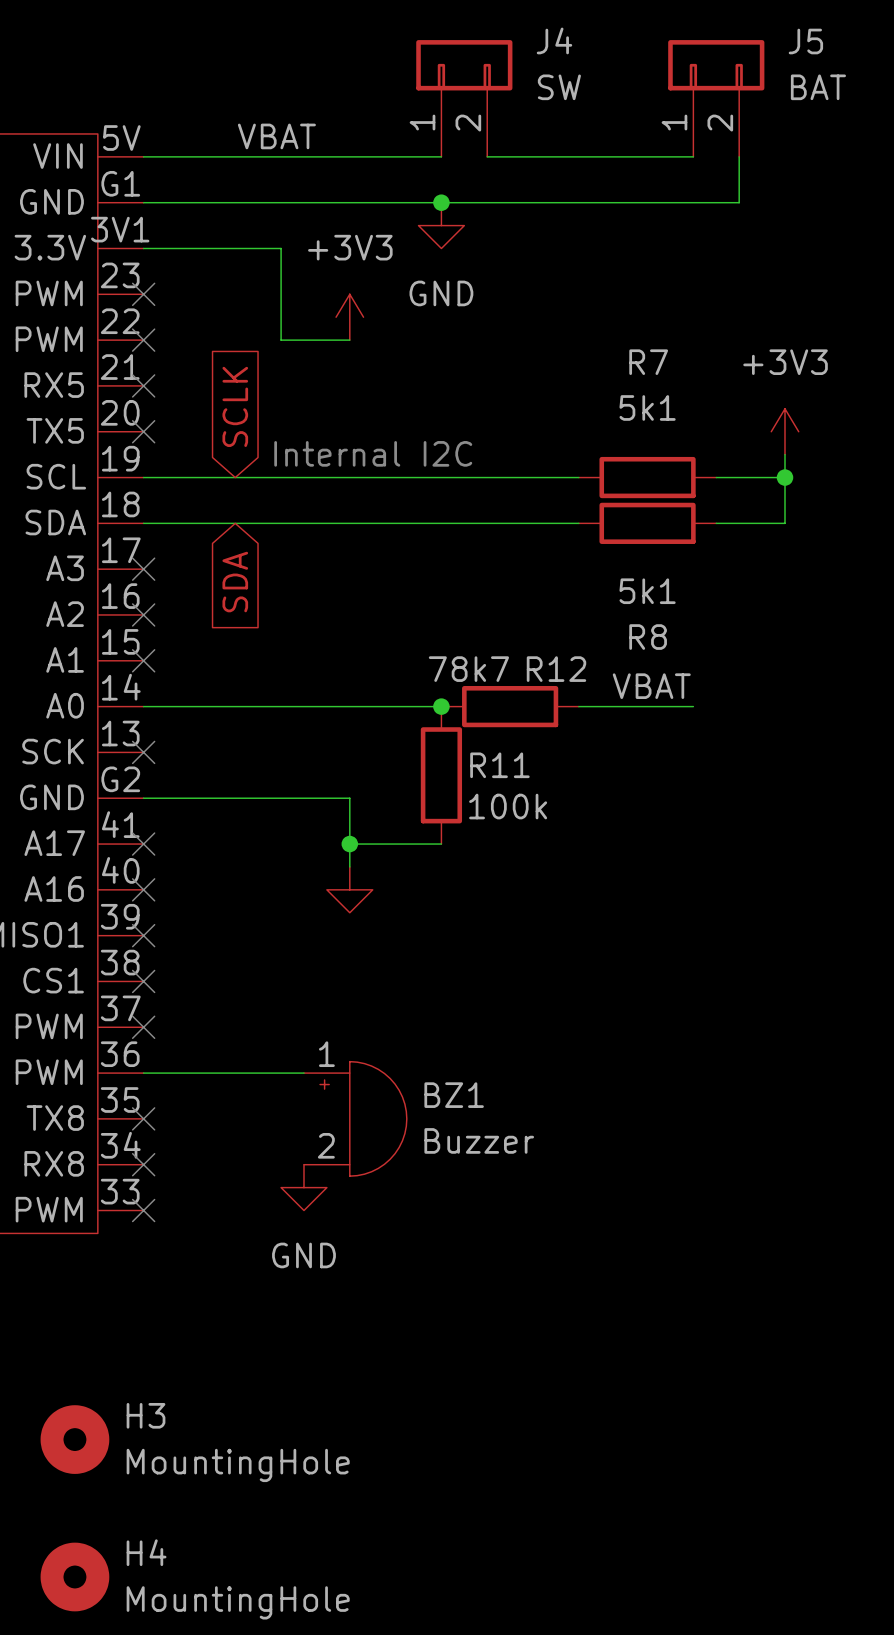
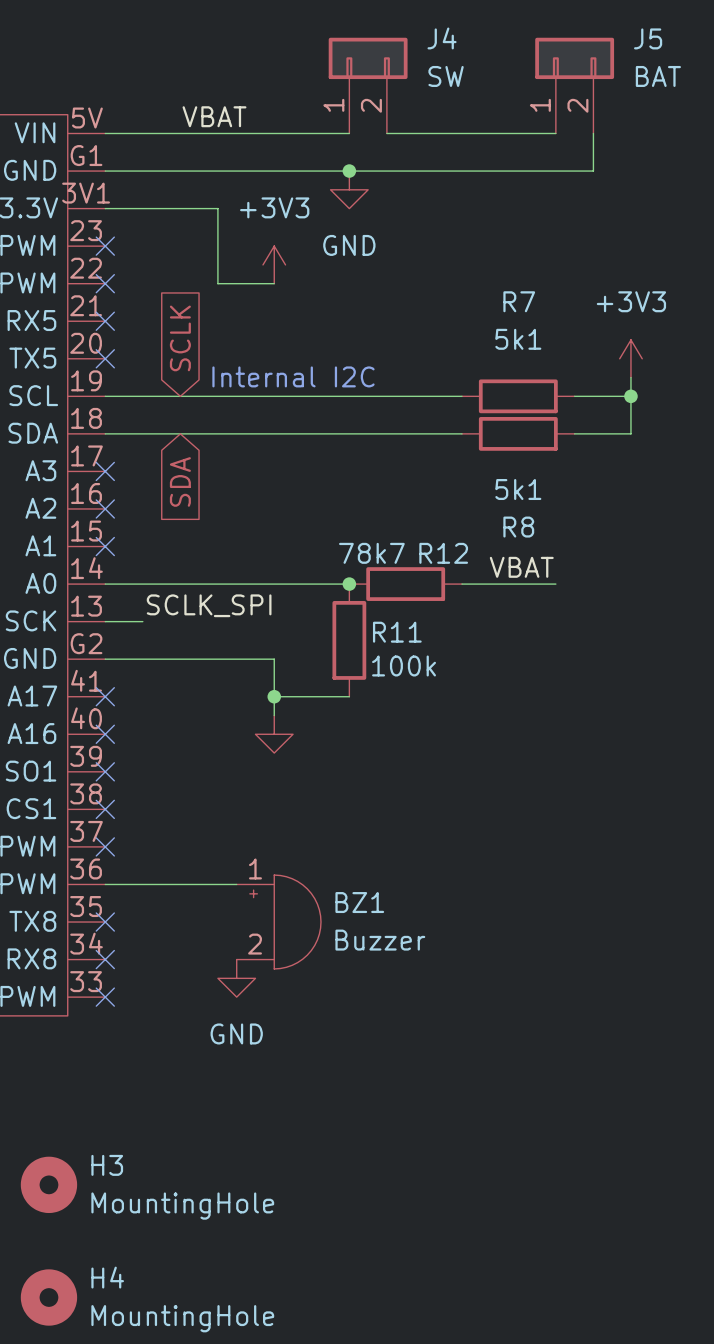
label: none -> SCLK_SPI (209, 605)
wire: none -> (105, 621) (142, 621)
no-connect mark: (143, 752) -> none

